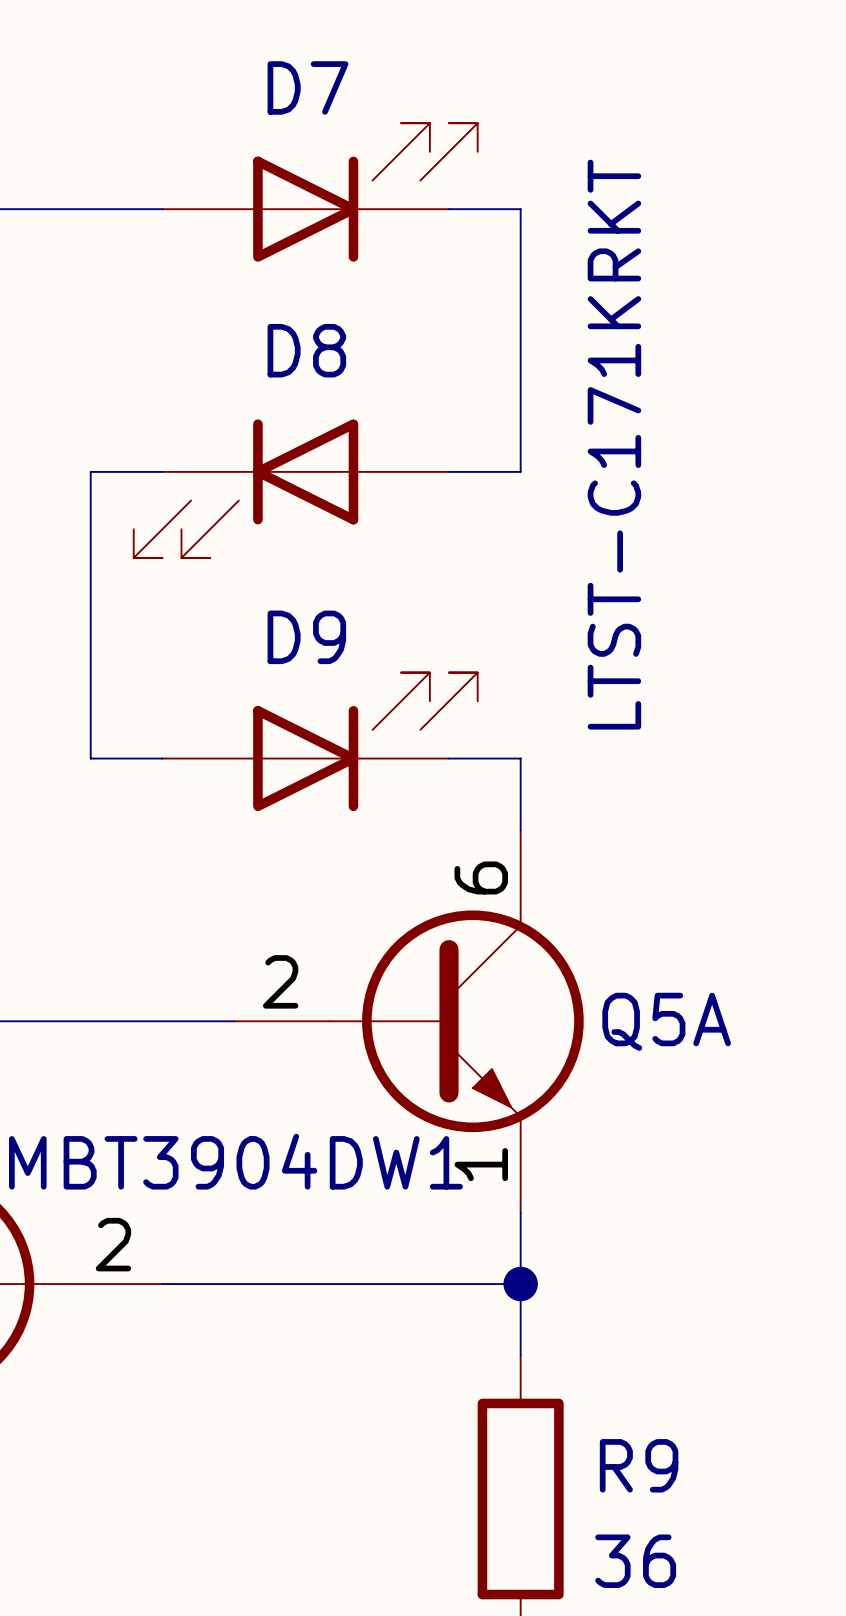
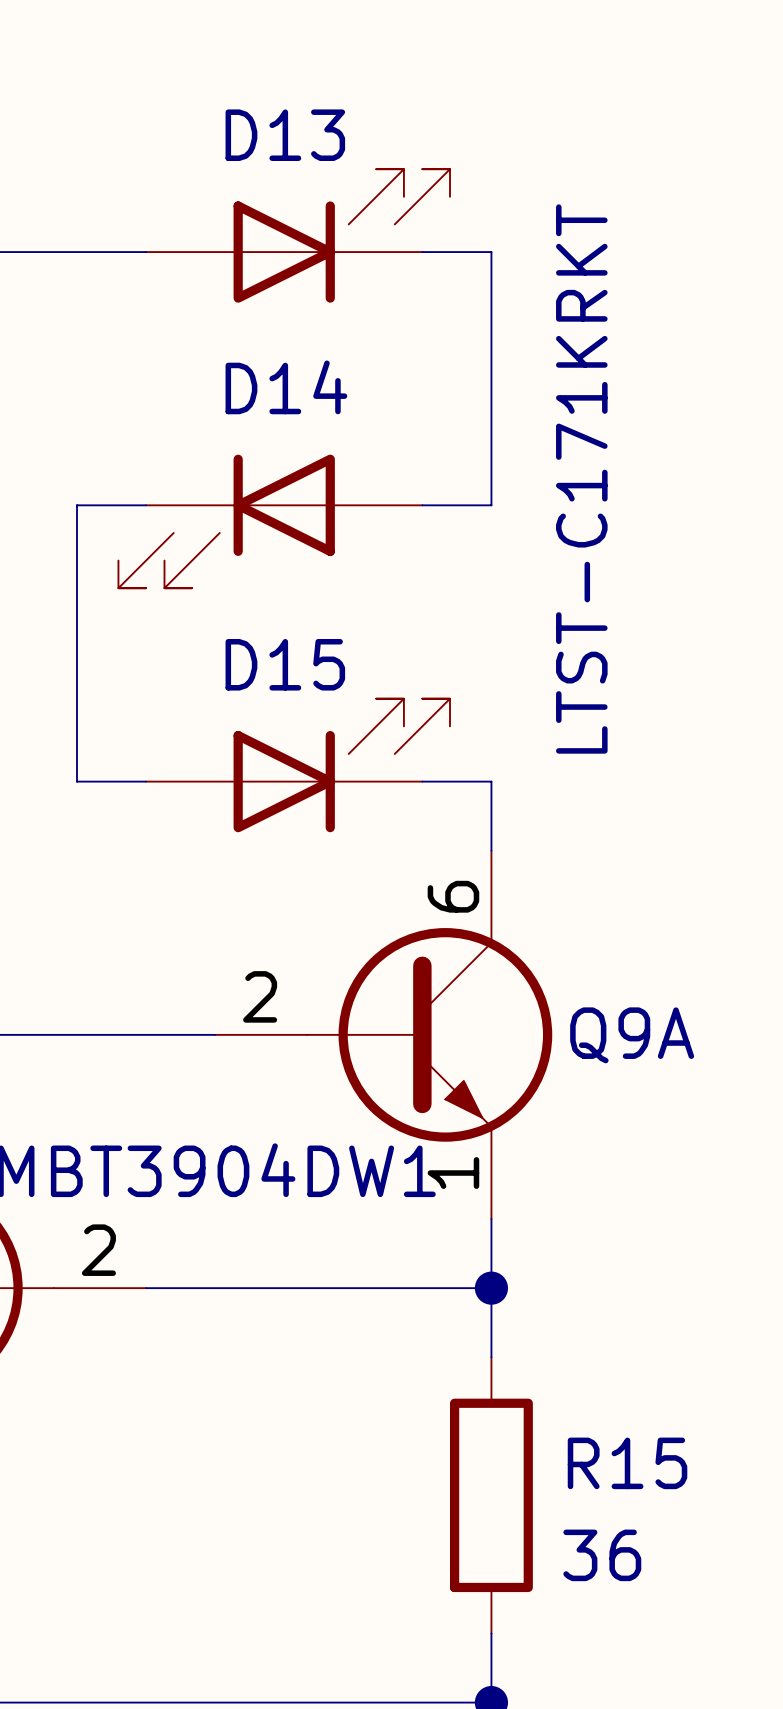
D7 name: D7 (307, 87) -> D13 (285, 135)
D8 name: D8 (306, 350) -> D14 (286, 387)
D9 name: D9 (306, 637) -> D15 (285, 664)
Q5A name: Q5A (666, 1021) -> Q9A (632, 1035)
R9 name: R9 (639, 1465) -> R15 (627, 1463)

